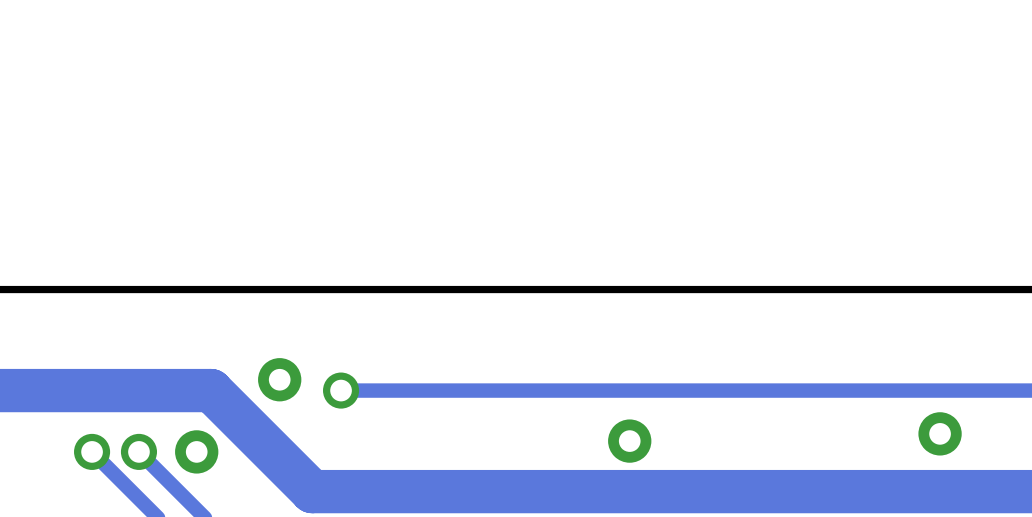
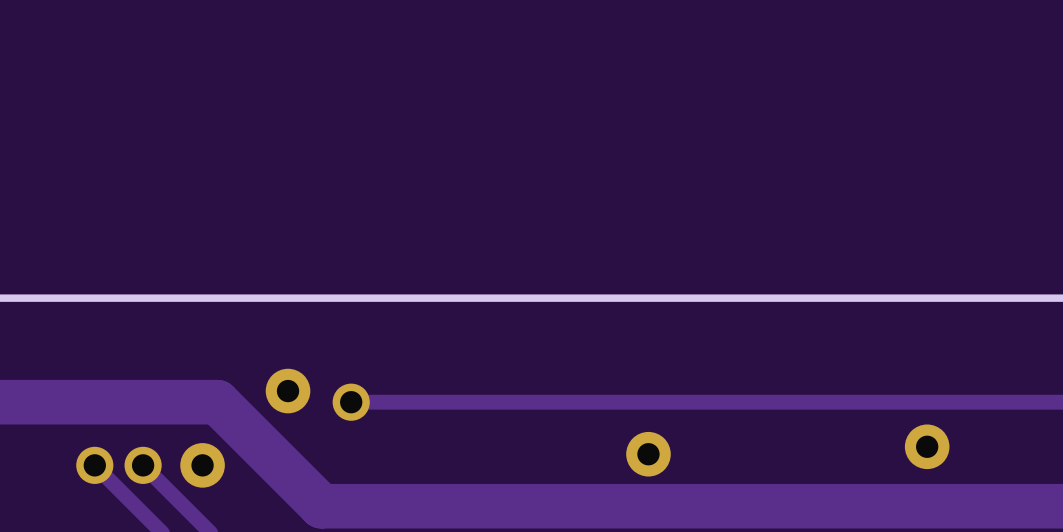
via position: (940, 433) -> (927, 446)

